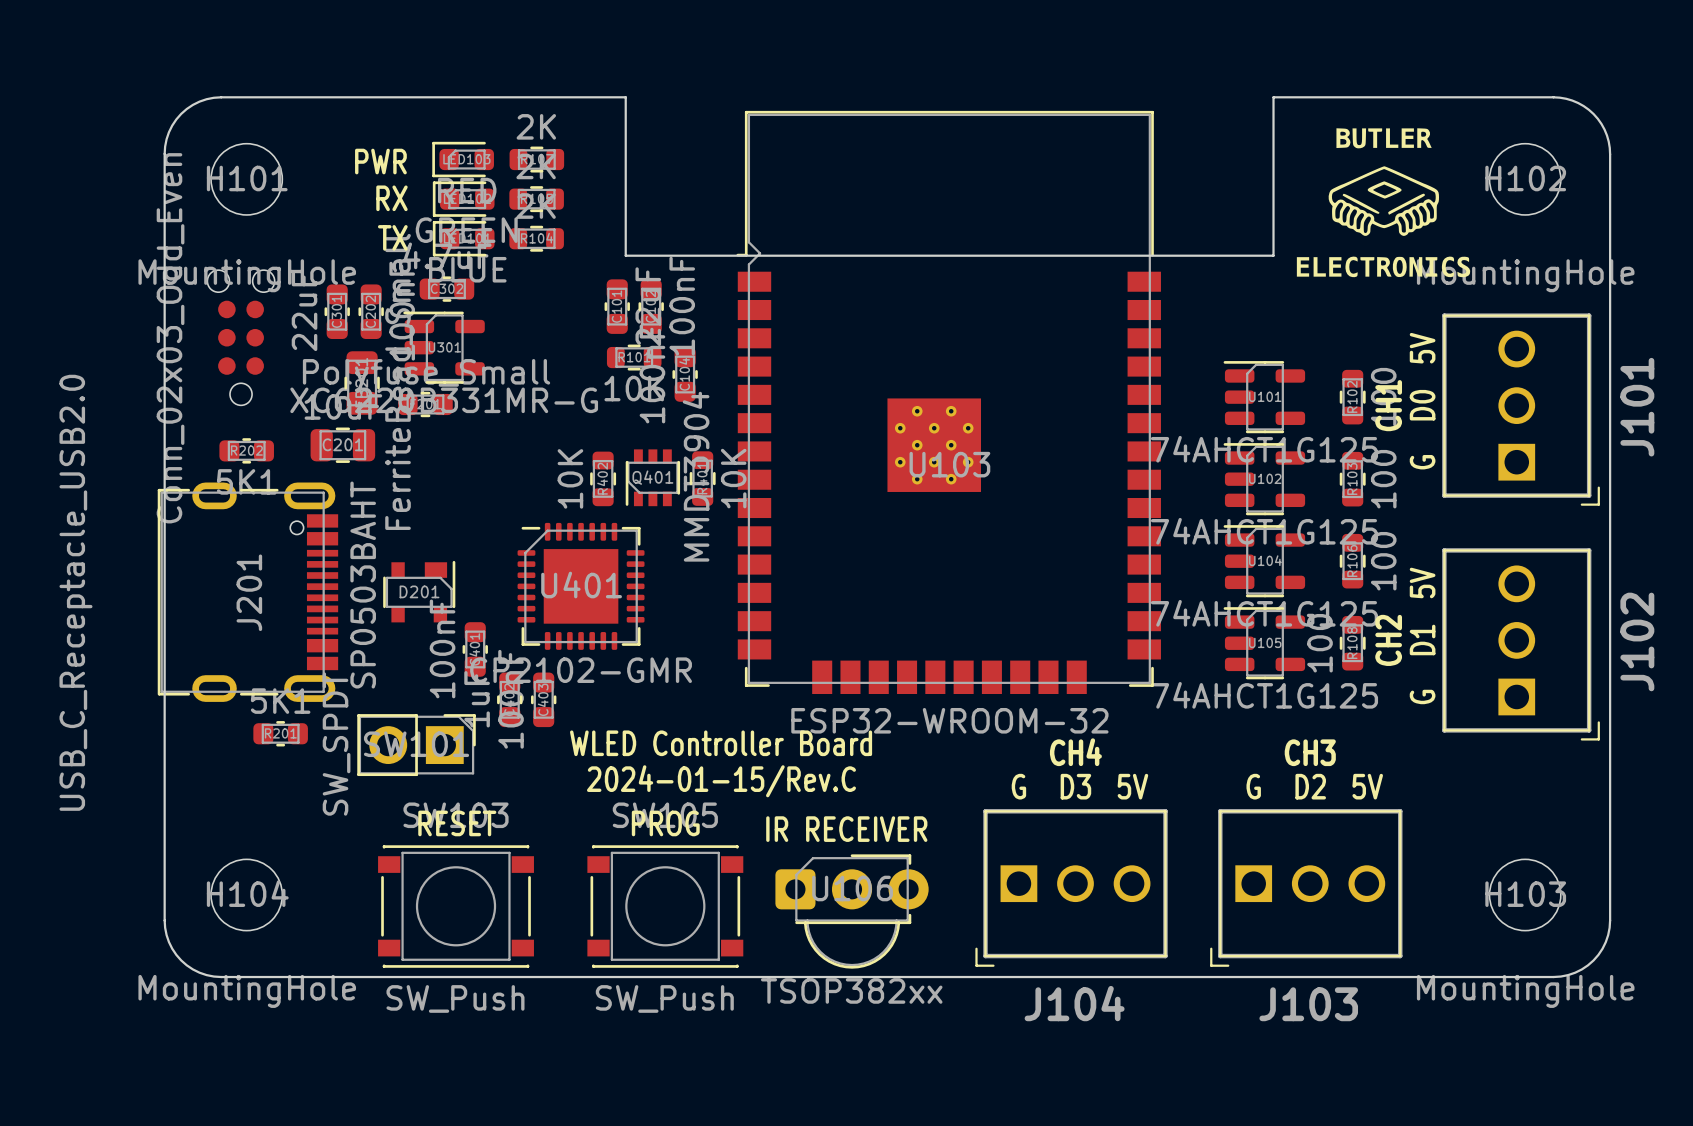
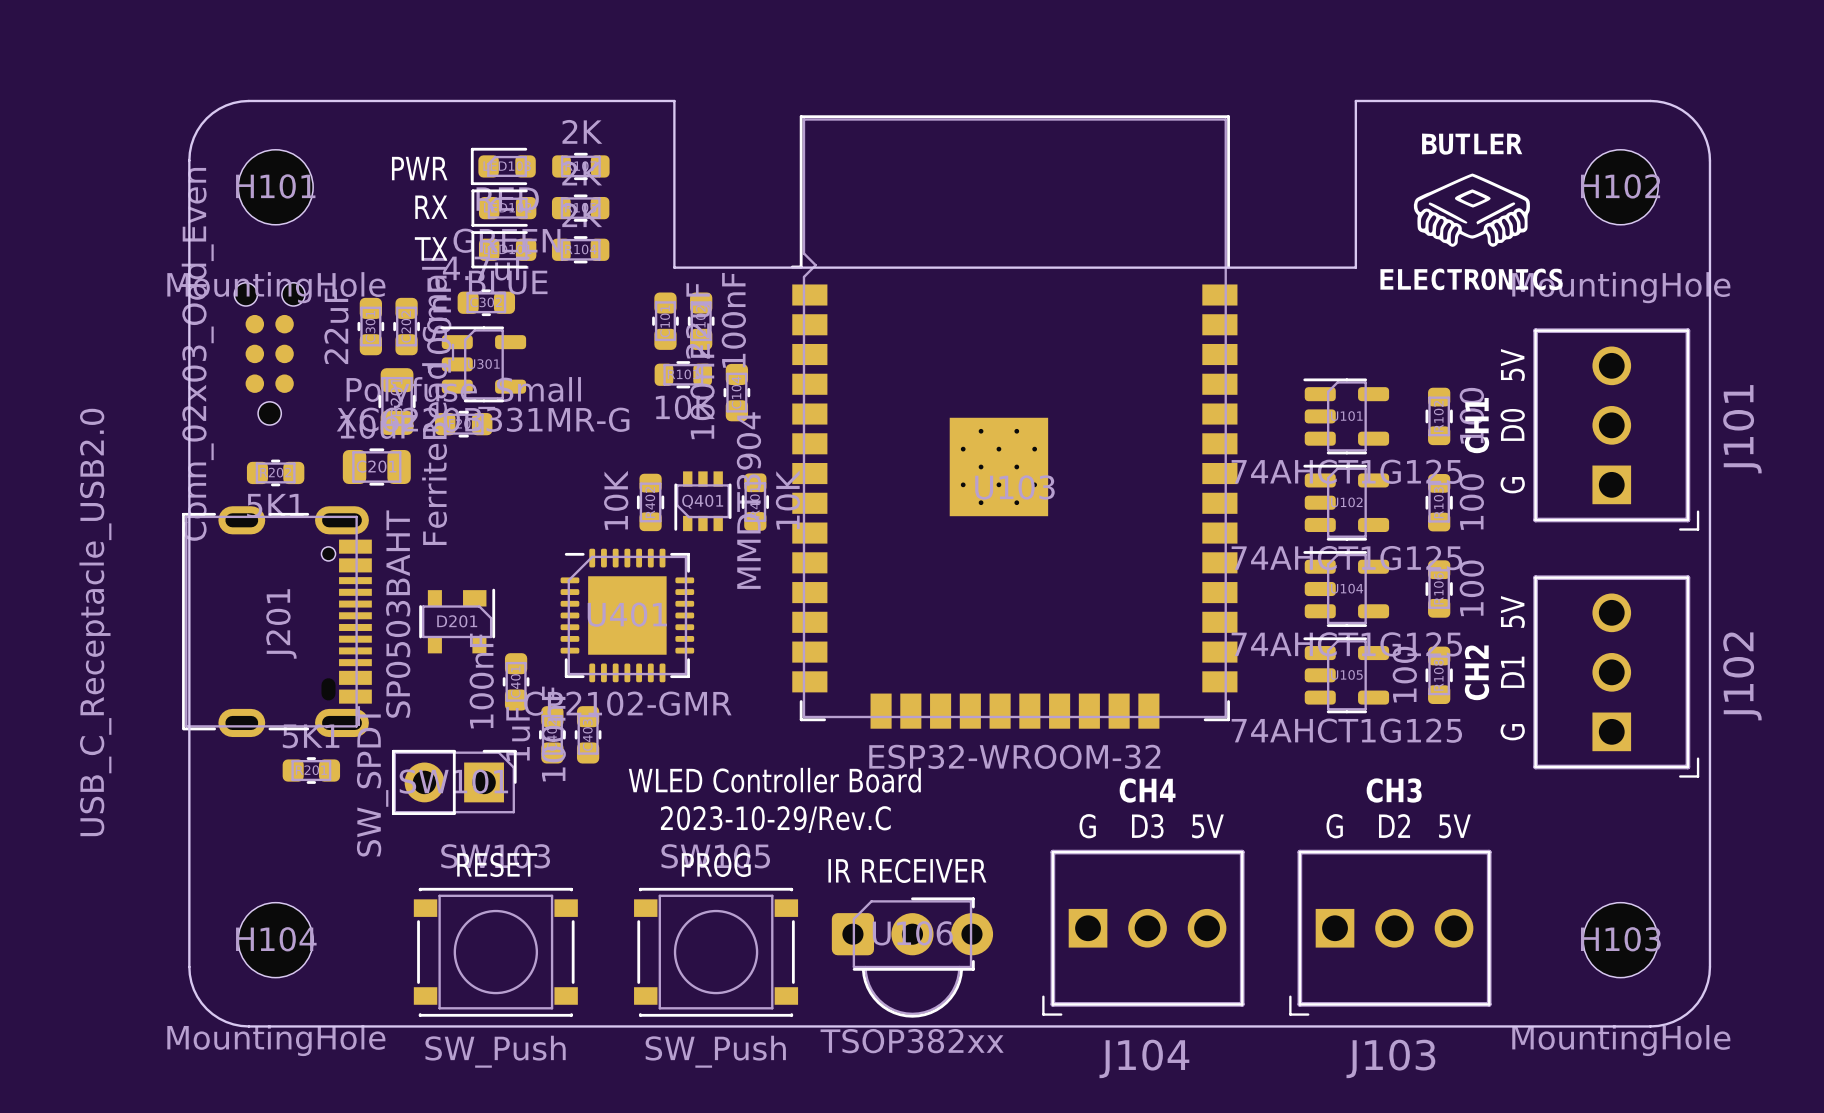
text: 2024-01-15/Rev.C (721, 781) -> 2023-10-29/Rev.C (775, 819)

